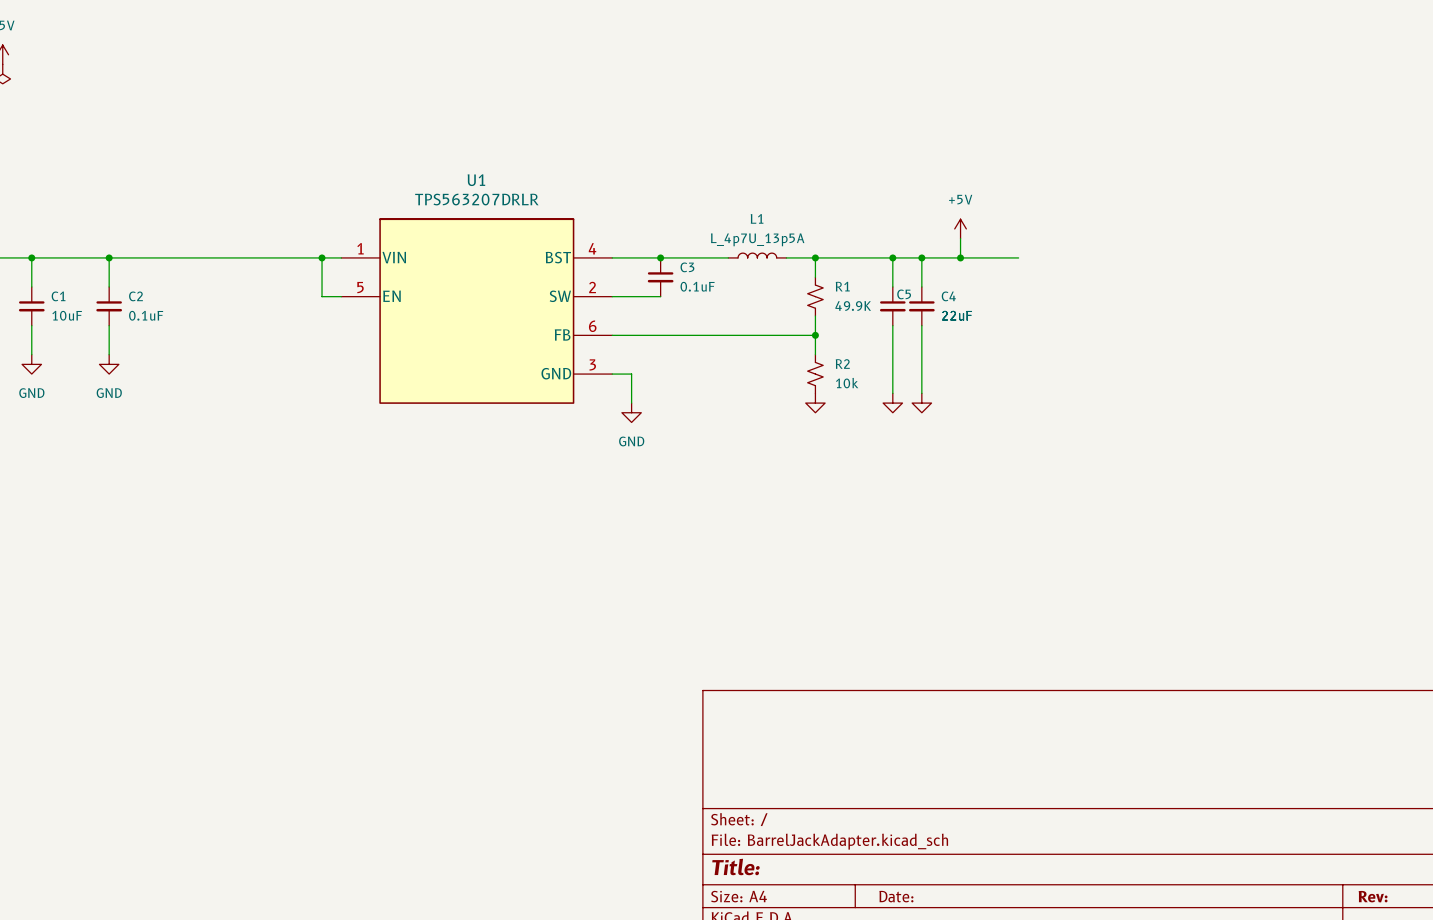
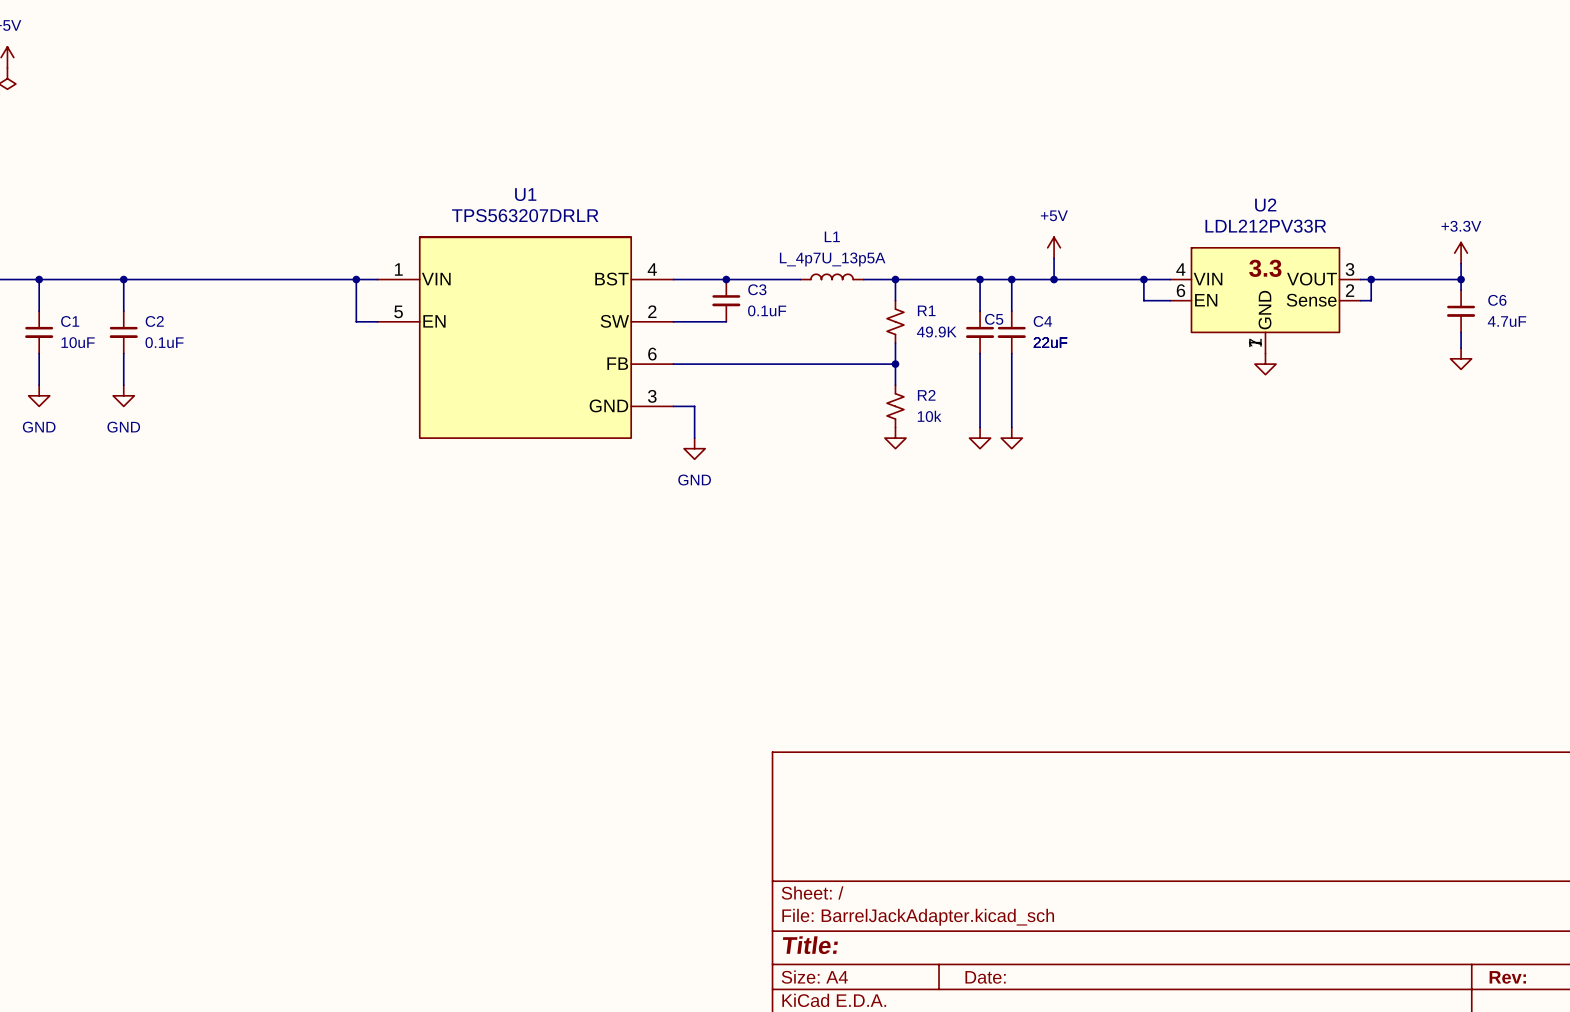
power symbol: none -> +3.3V (1461, 253)
wire: none -> (1461, 263) (1461, 290)
wire: none -> (1117, 279) (1170, 279)
wire: none -> (1143, 279) (1143, 300) (1170, 300)
junction: none -> (1143, 279)
wire: none -> (1360, 279) (1461, 279)
wire: none -> (1371, 279) (1371, 300) (1360, 300)
junction: none -> (1371, 279)
junction: none -> (1461, 279)
U2: none -> LDL212PV33R (1265, 300)
C6: none -> (1461, 311)
wire: none -> (1461, 332) (1461, 348)
power symbol: none -> (1461, 358)
power symbol: none -> (1265, 364)

